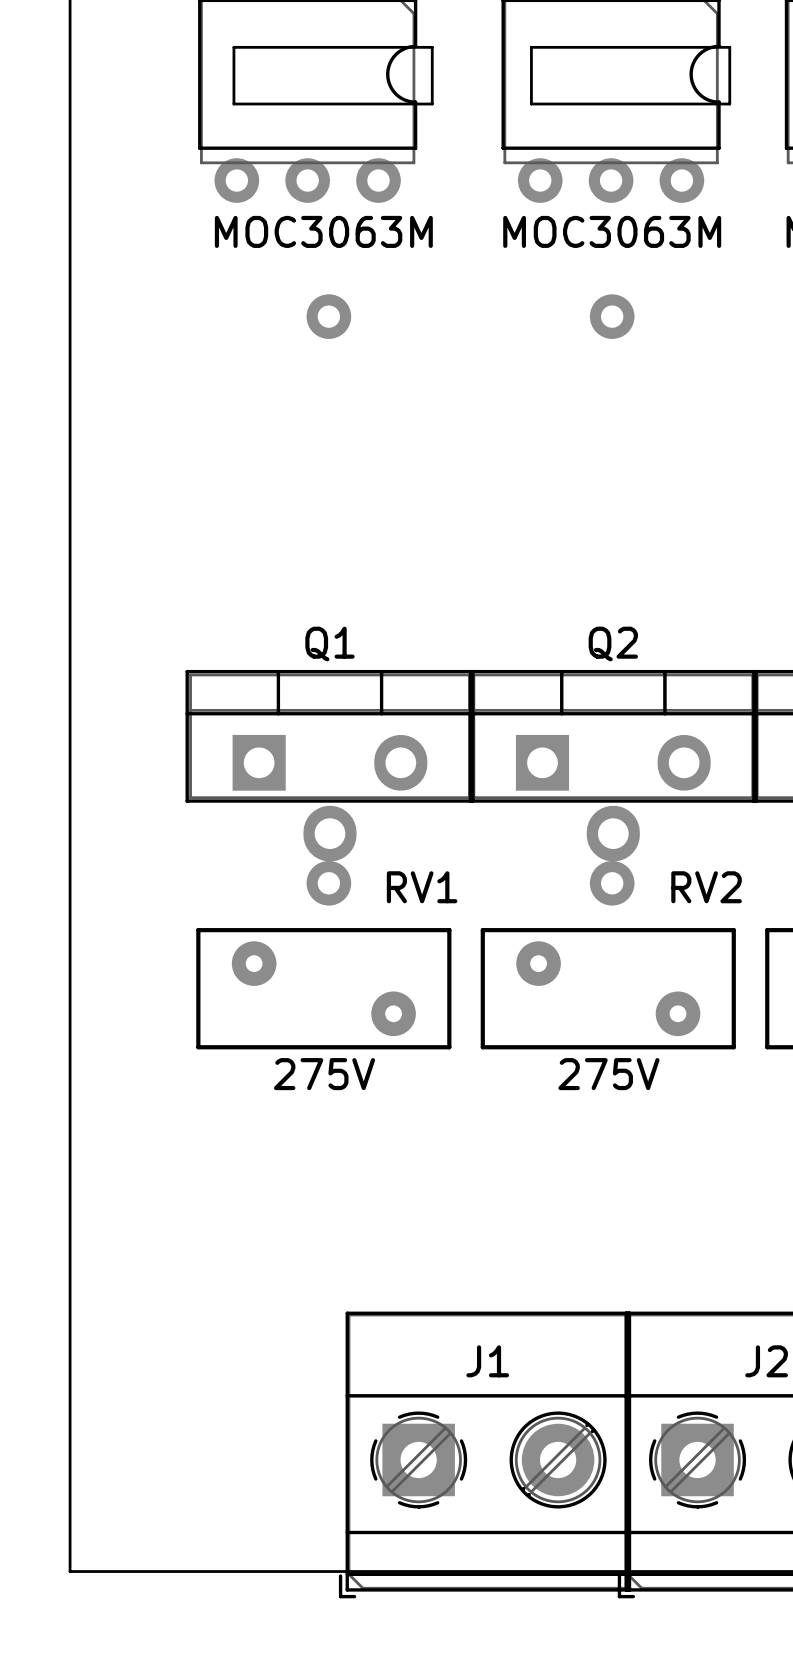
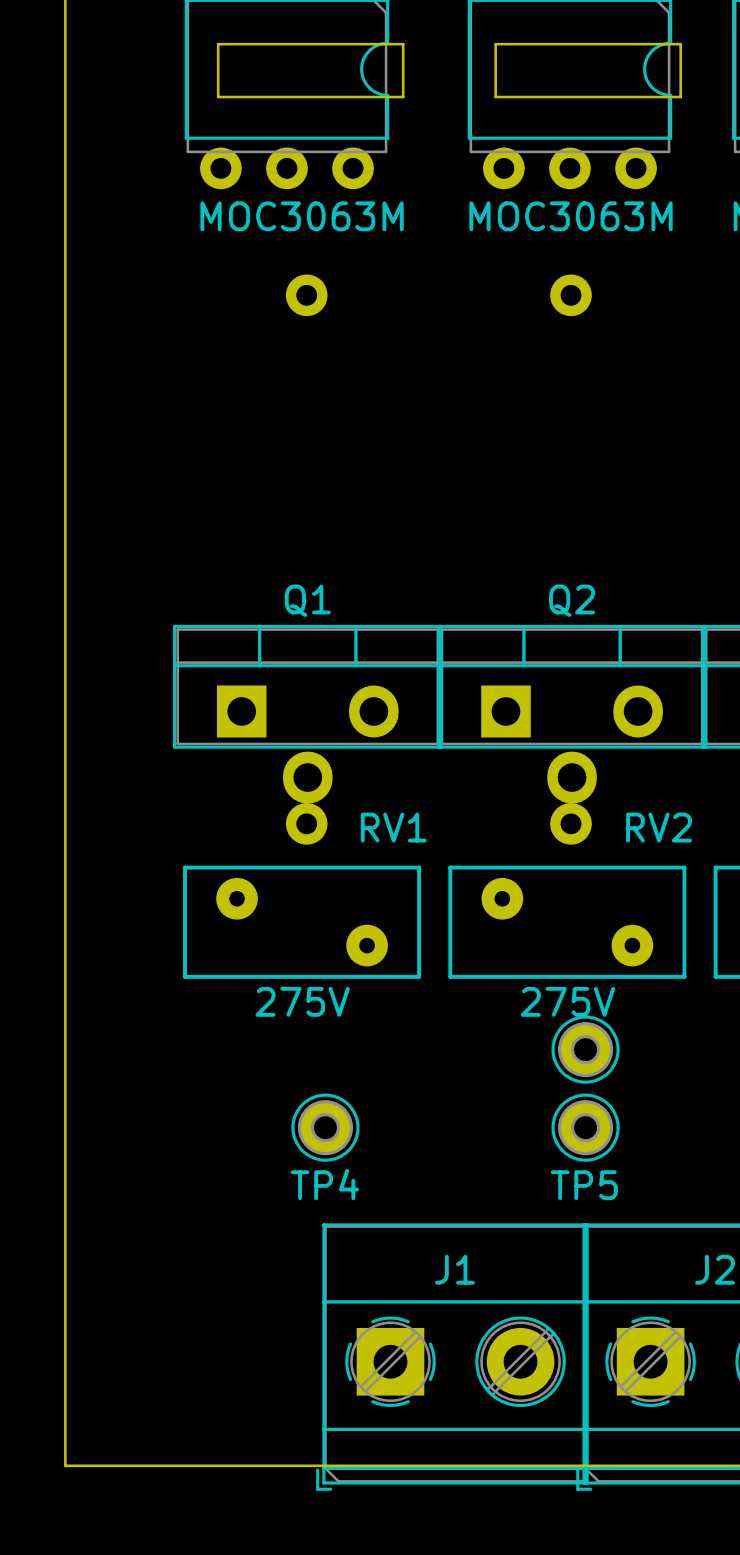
part: none -> (585, 1049)
TP4: none -> (325, 1127)
TP5: none -> (585, 1127)

